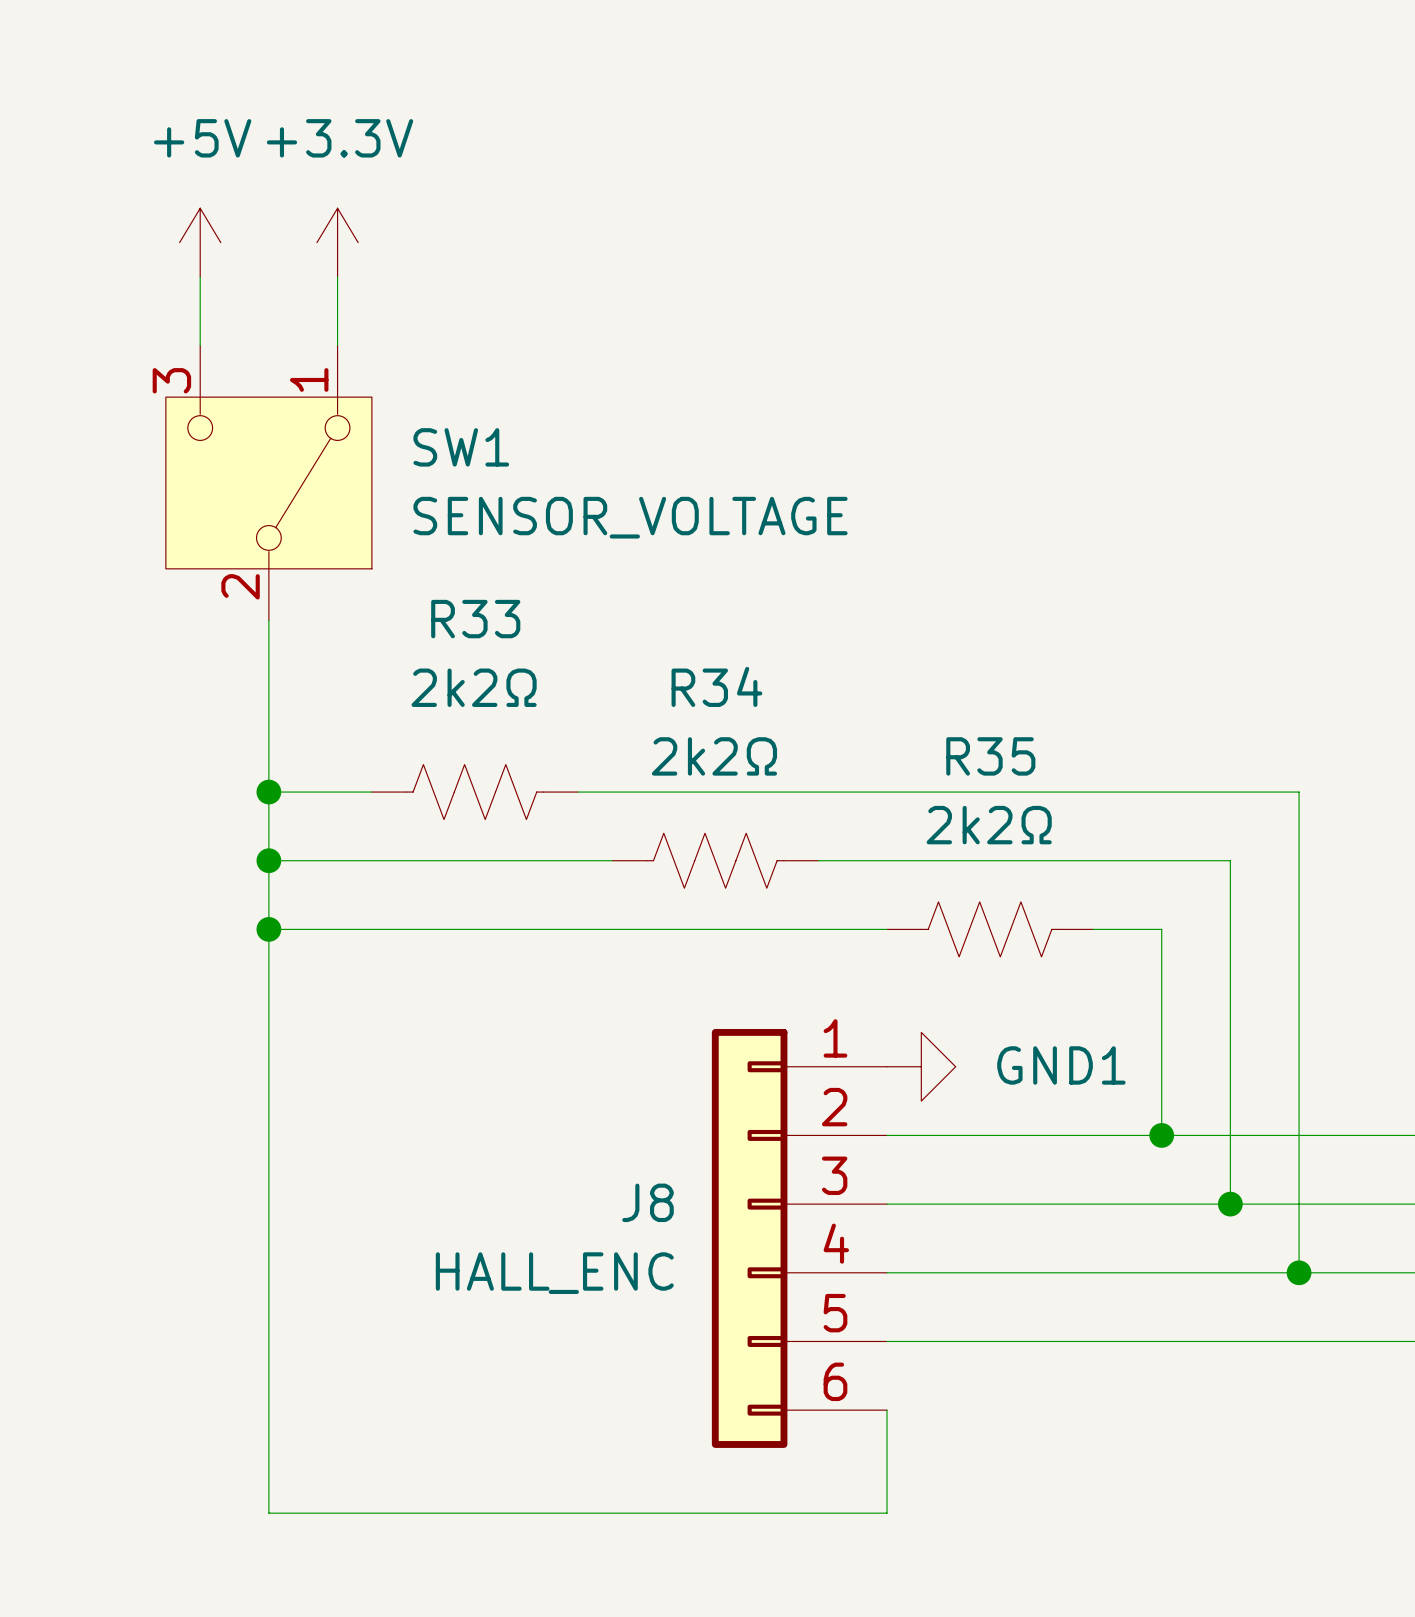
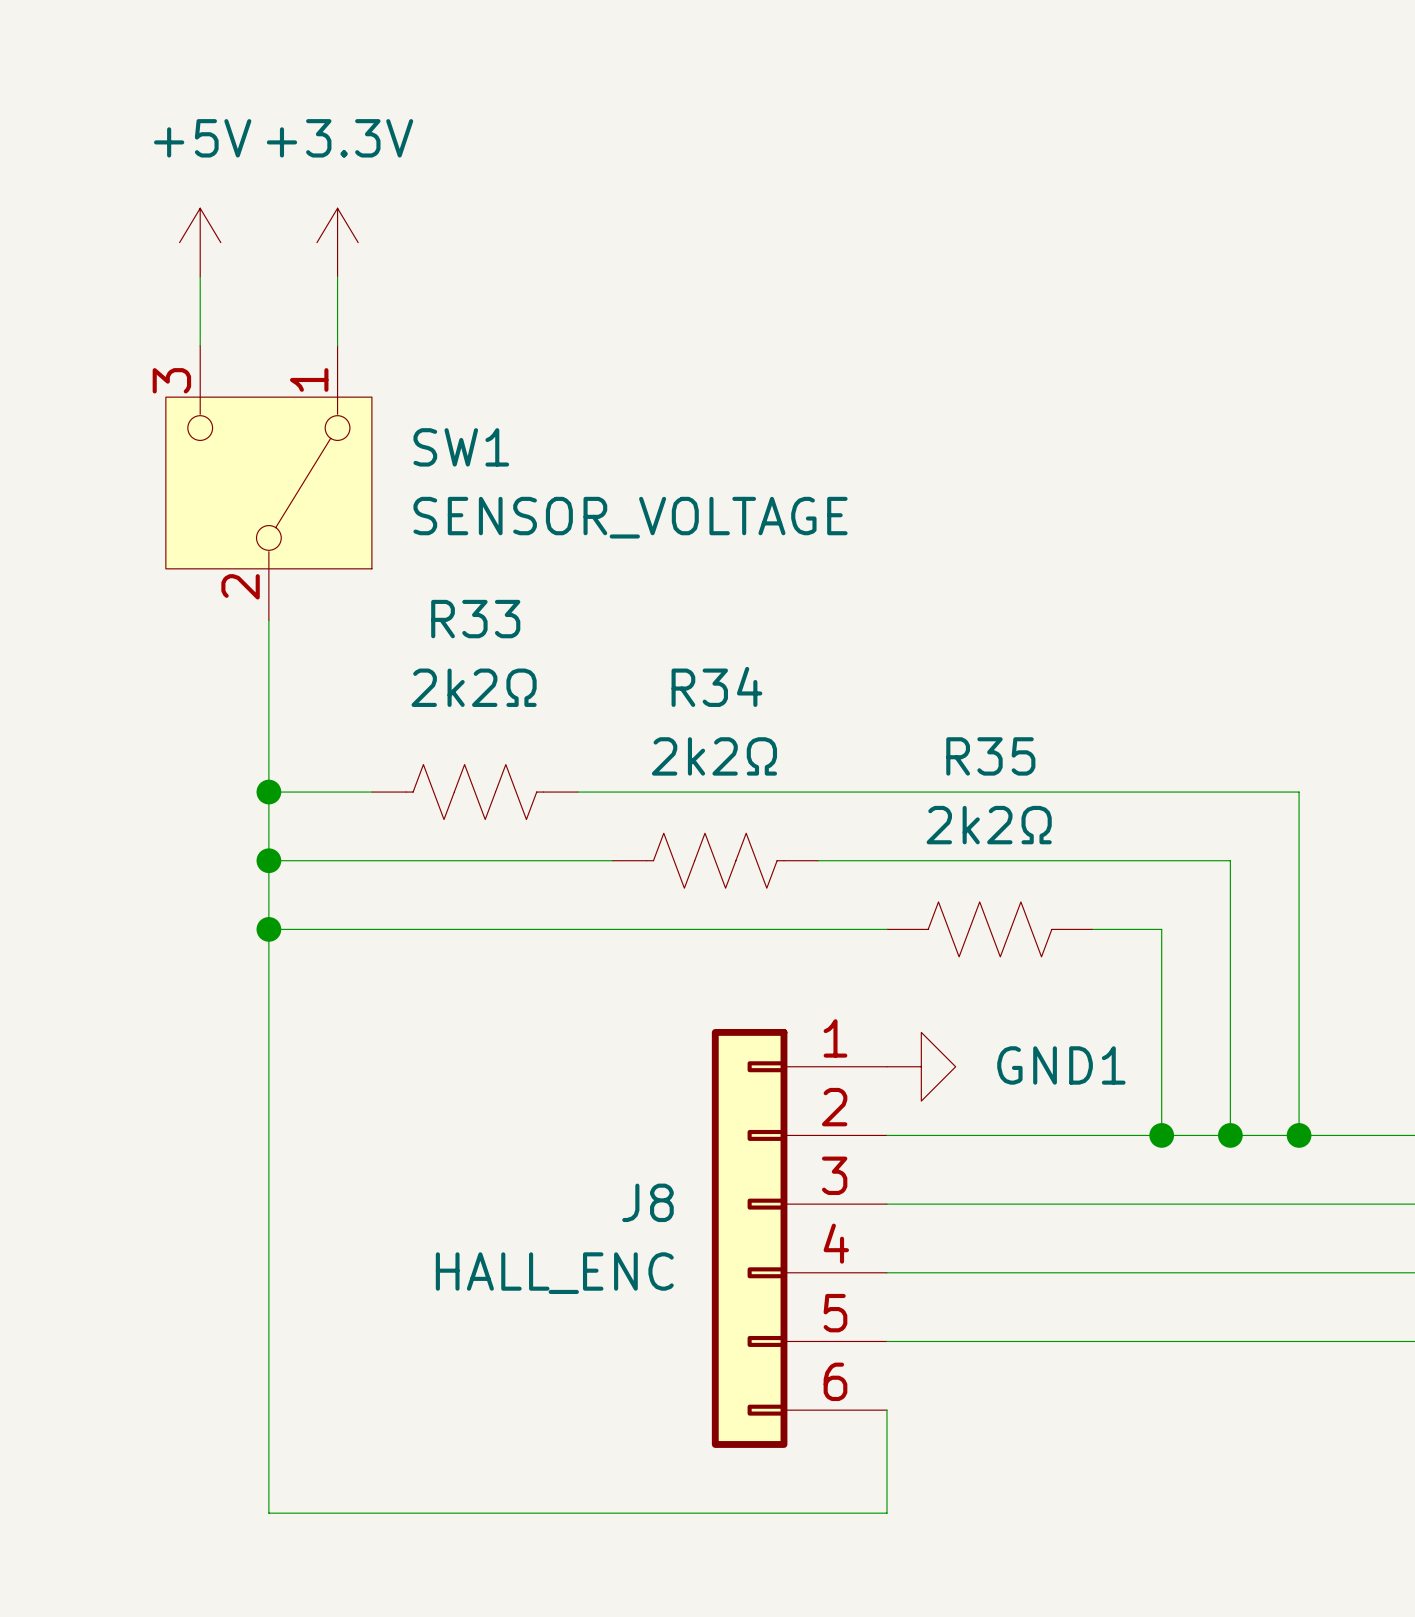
wire: (1230, 1135) (1230, 1204) -> none
junction: none -> (1230, 1135)
wire: (1299, 1135) (1299, 1272) -> none
junction: none -> (1299, 1135)
junction: (1230, 1204) -> none
junction: (1299, 1272) -> none

